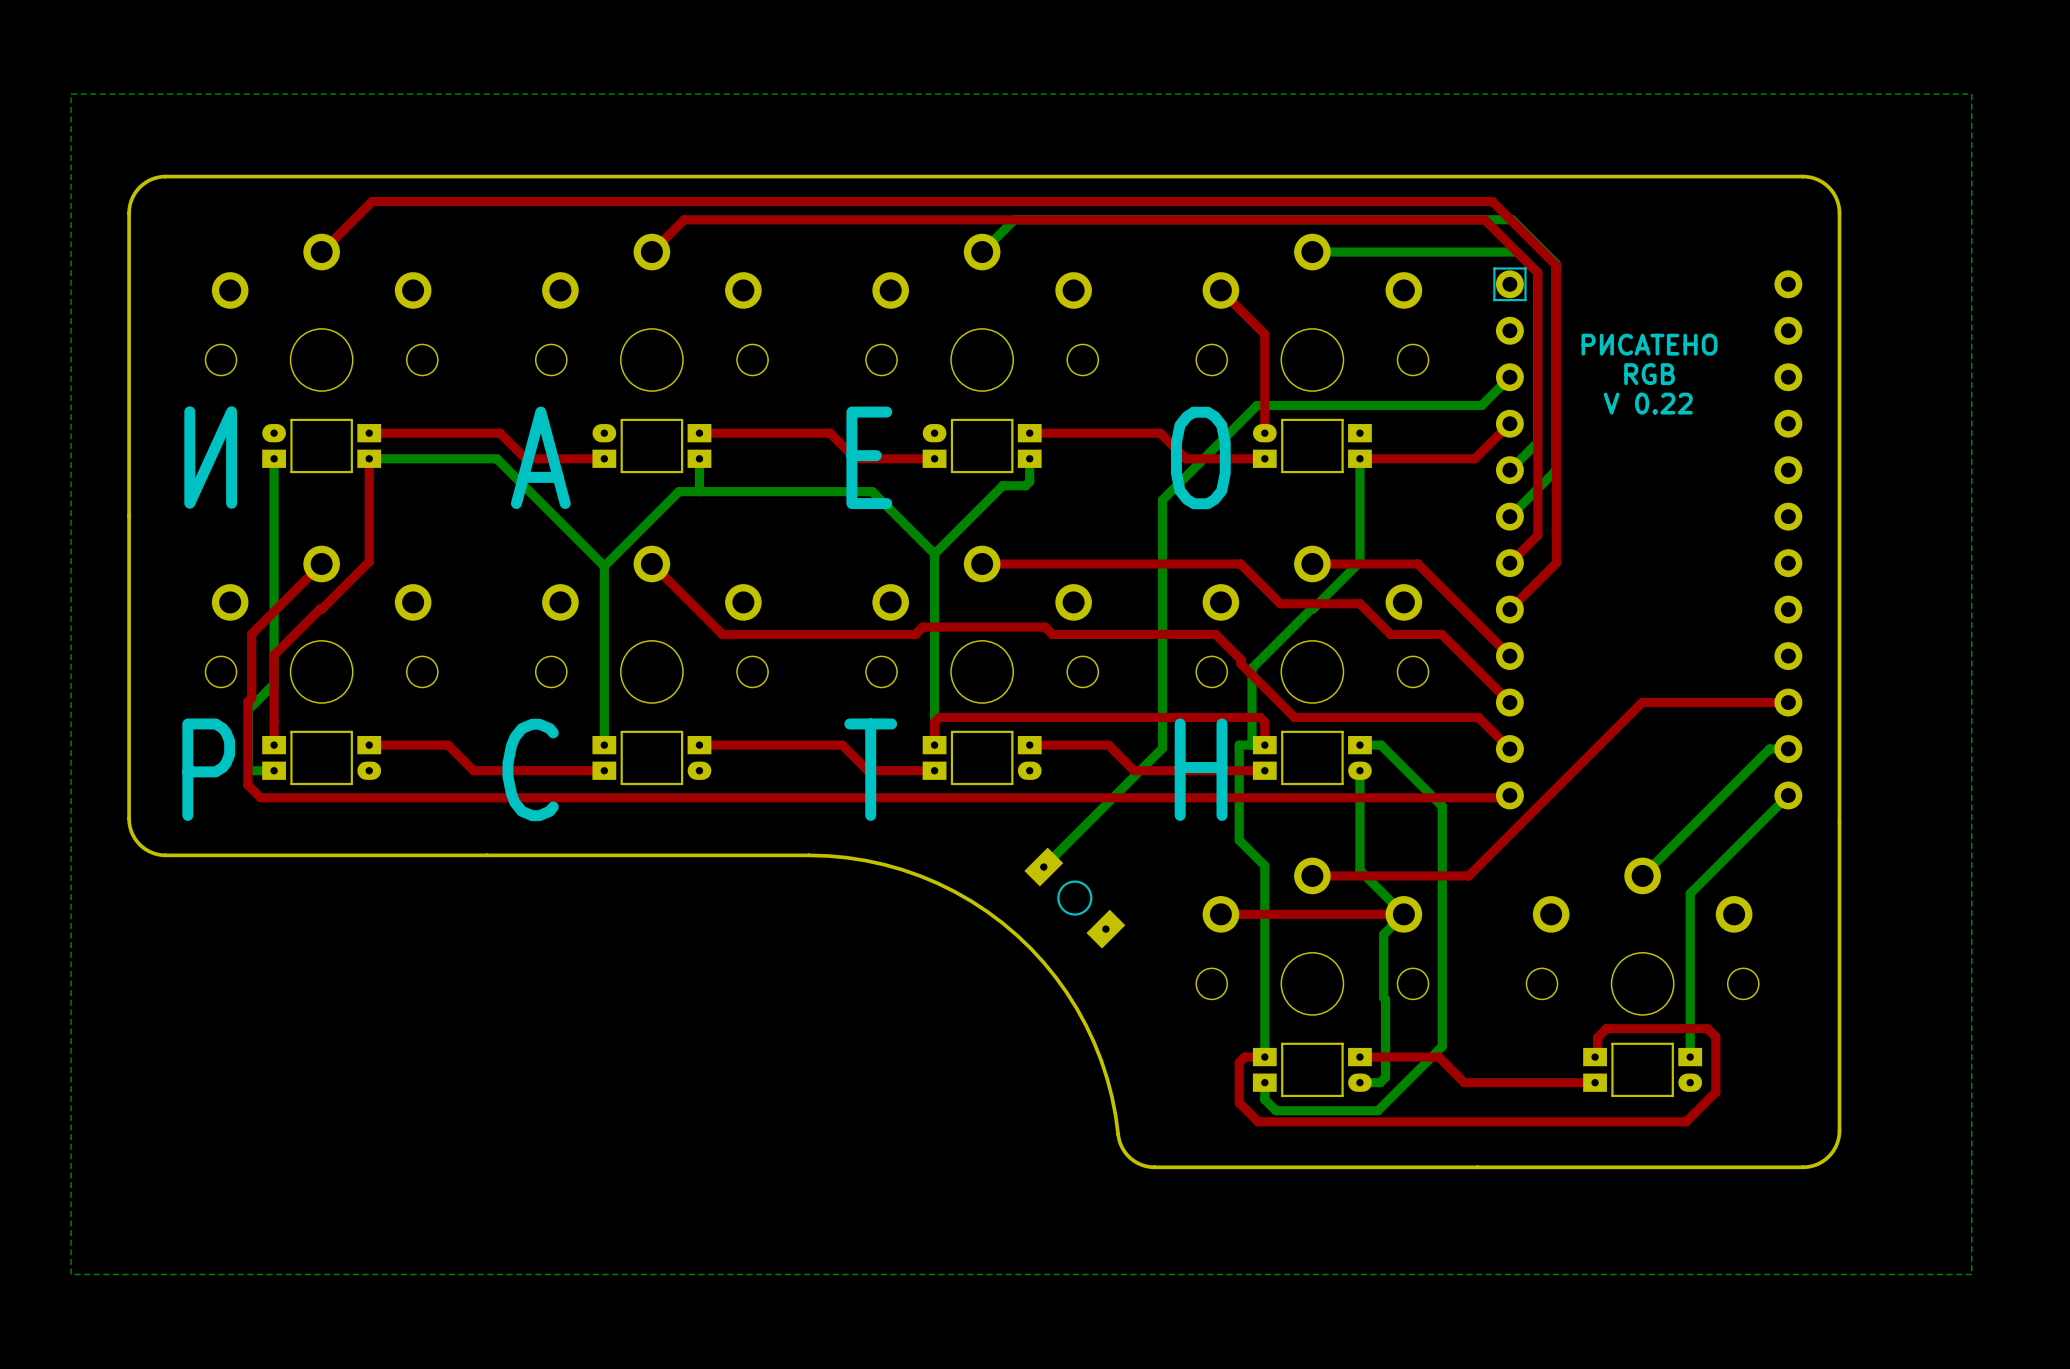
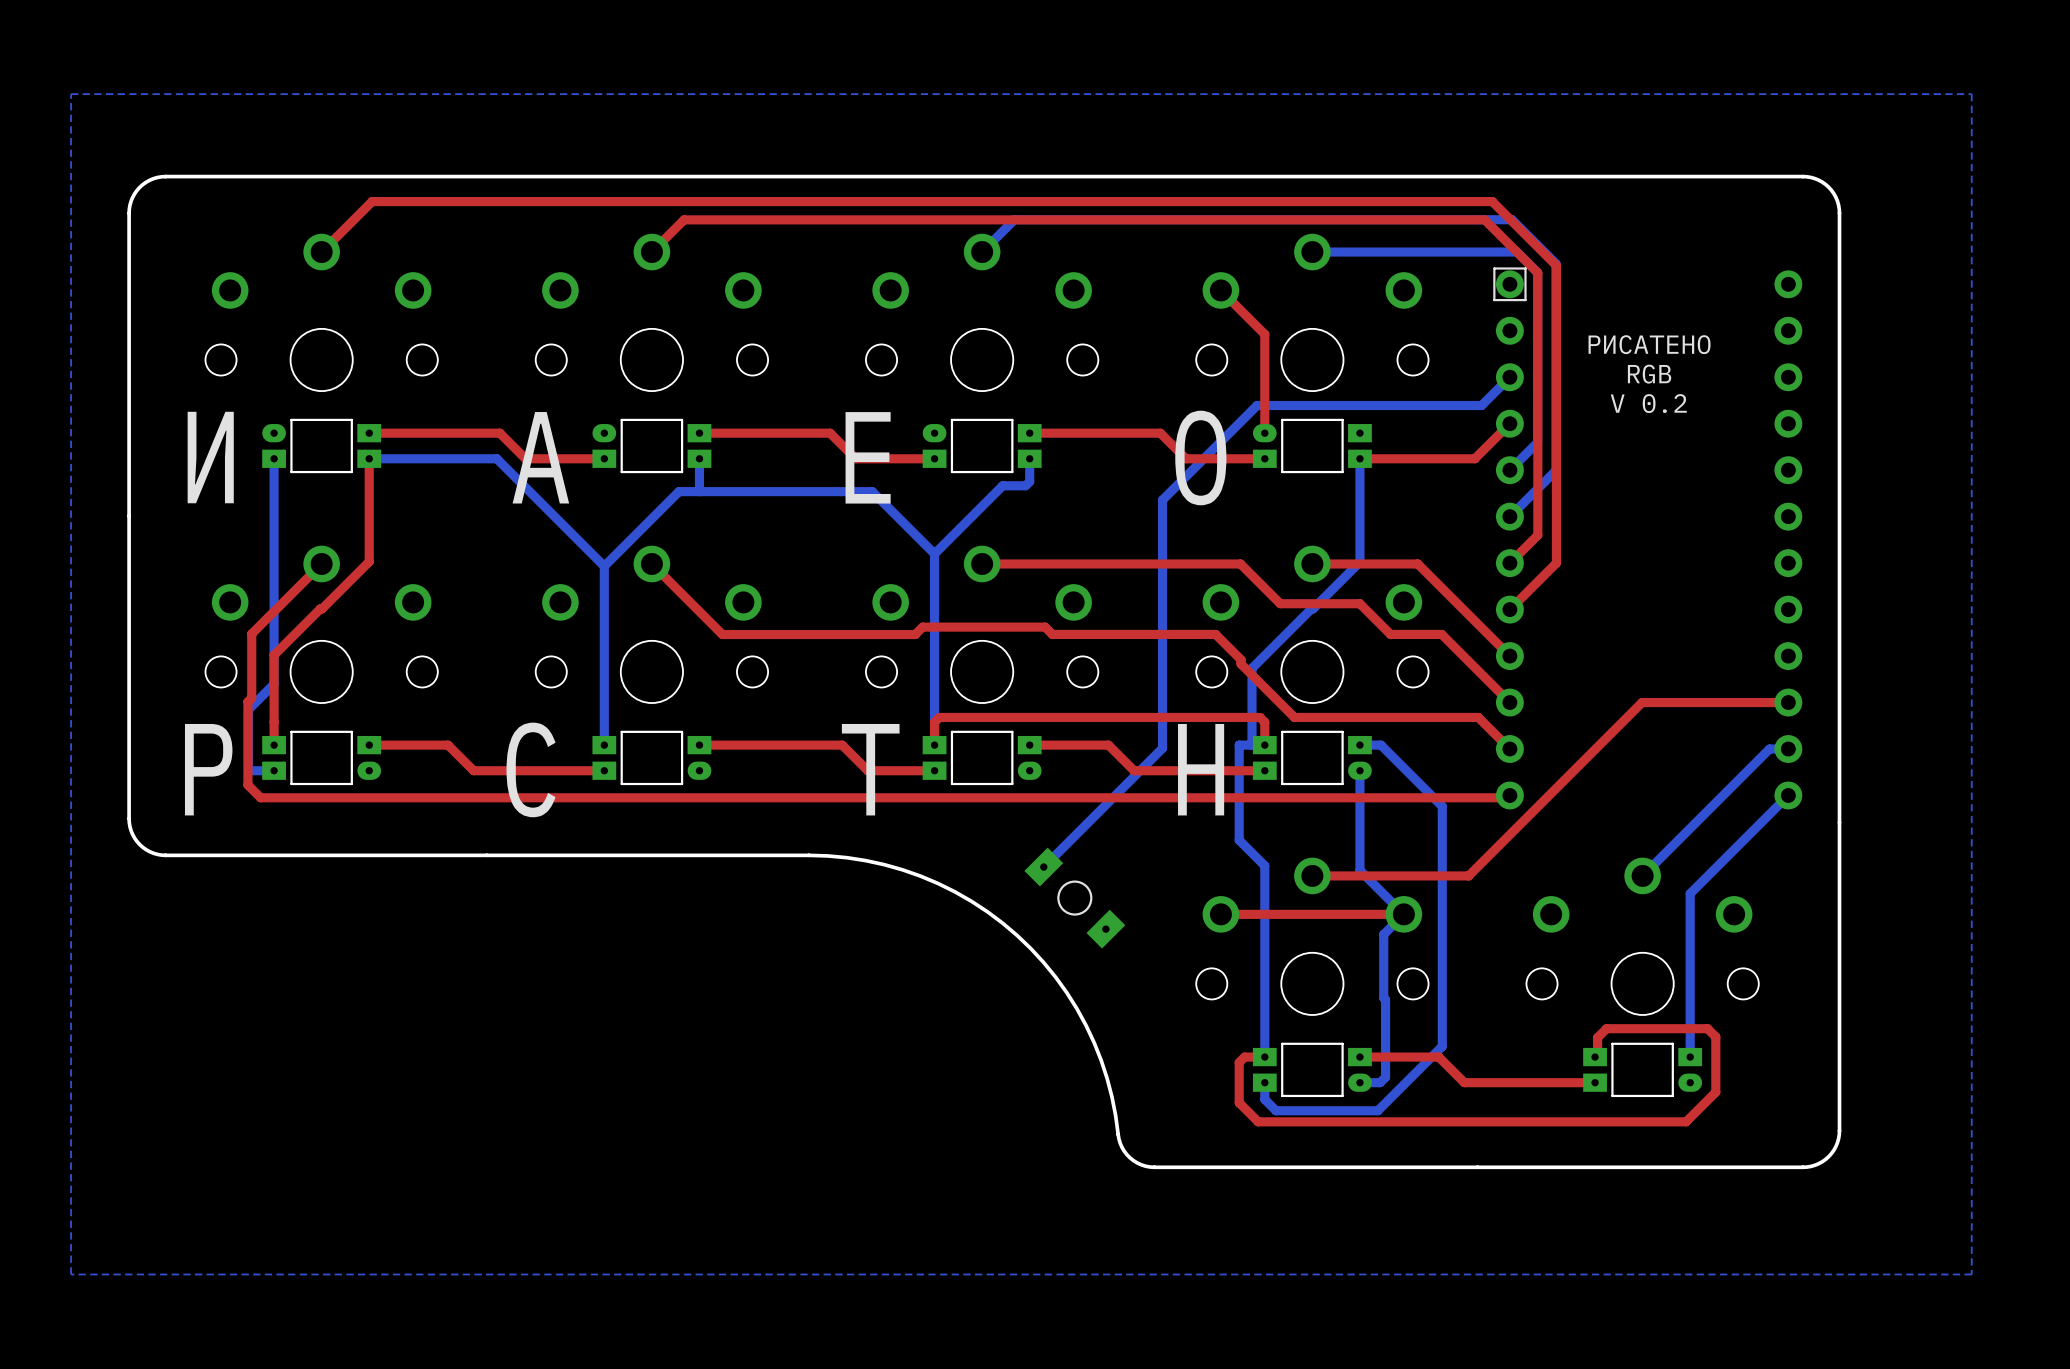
text: V 0.22 (1648, 403) -> V 0.2 (1648, 403)

